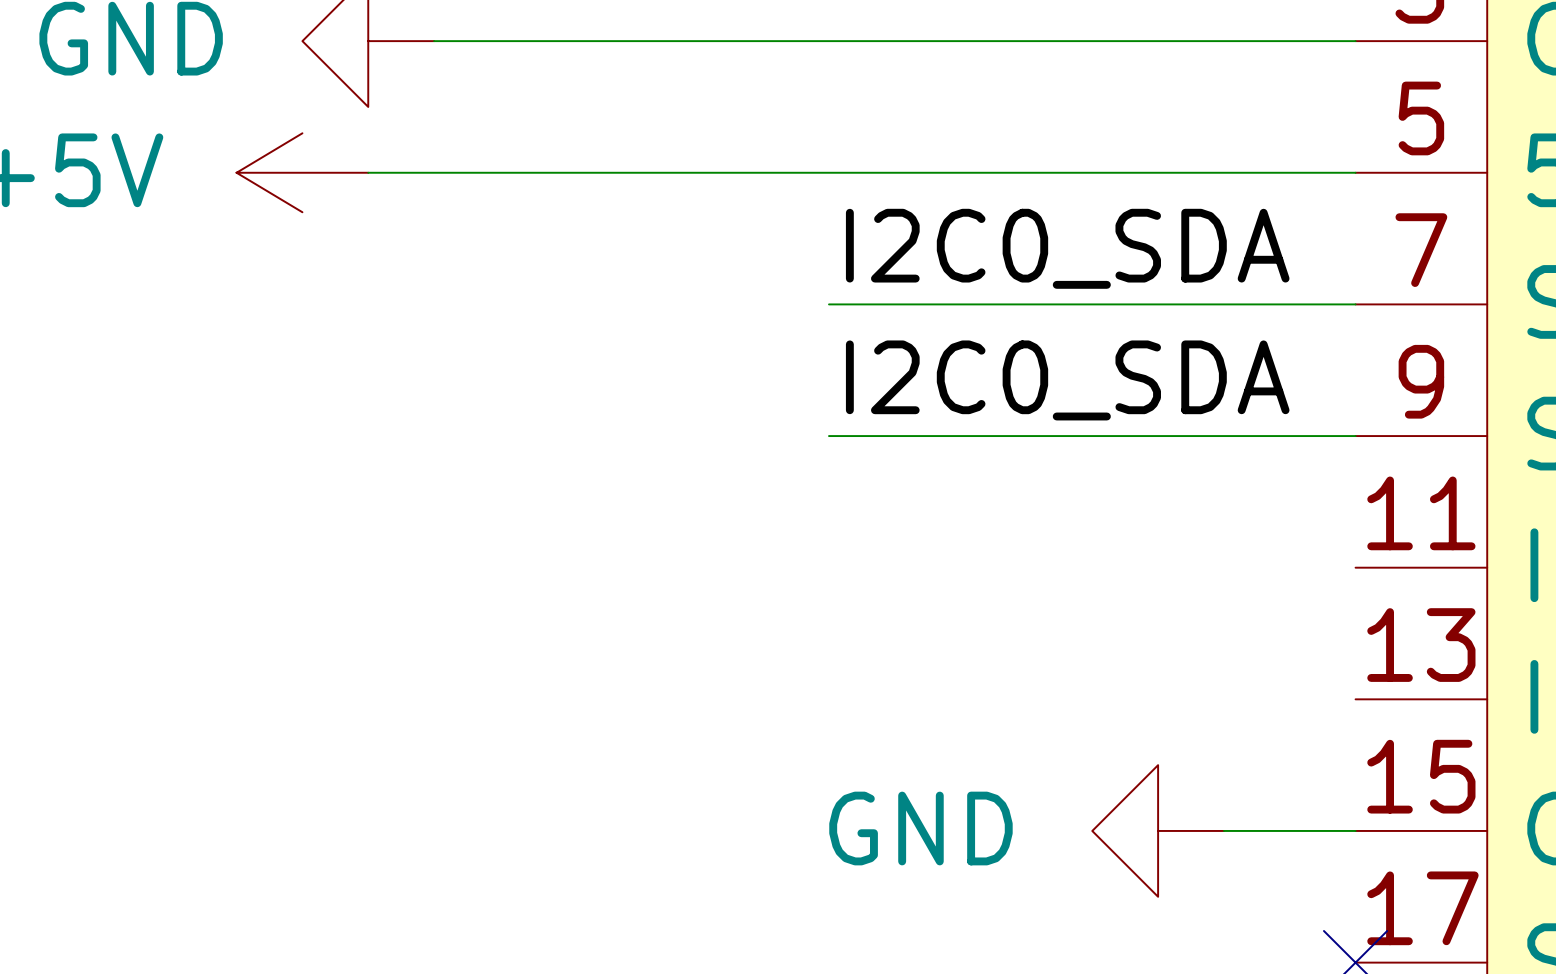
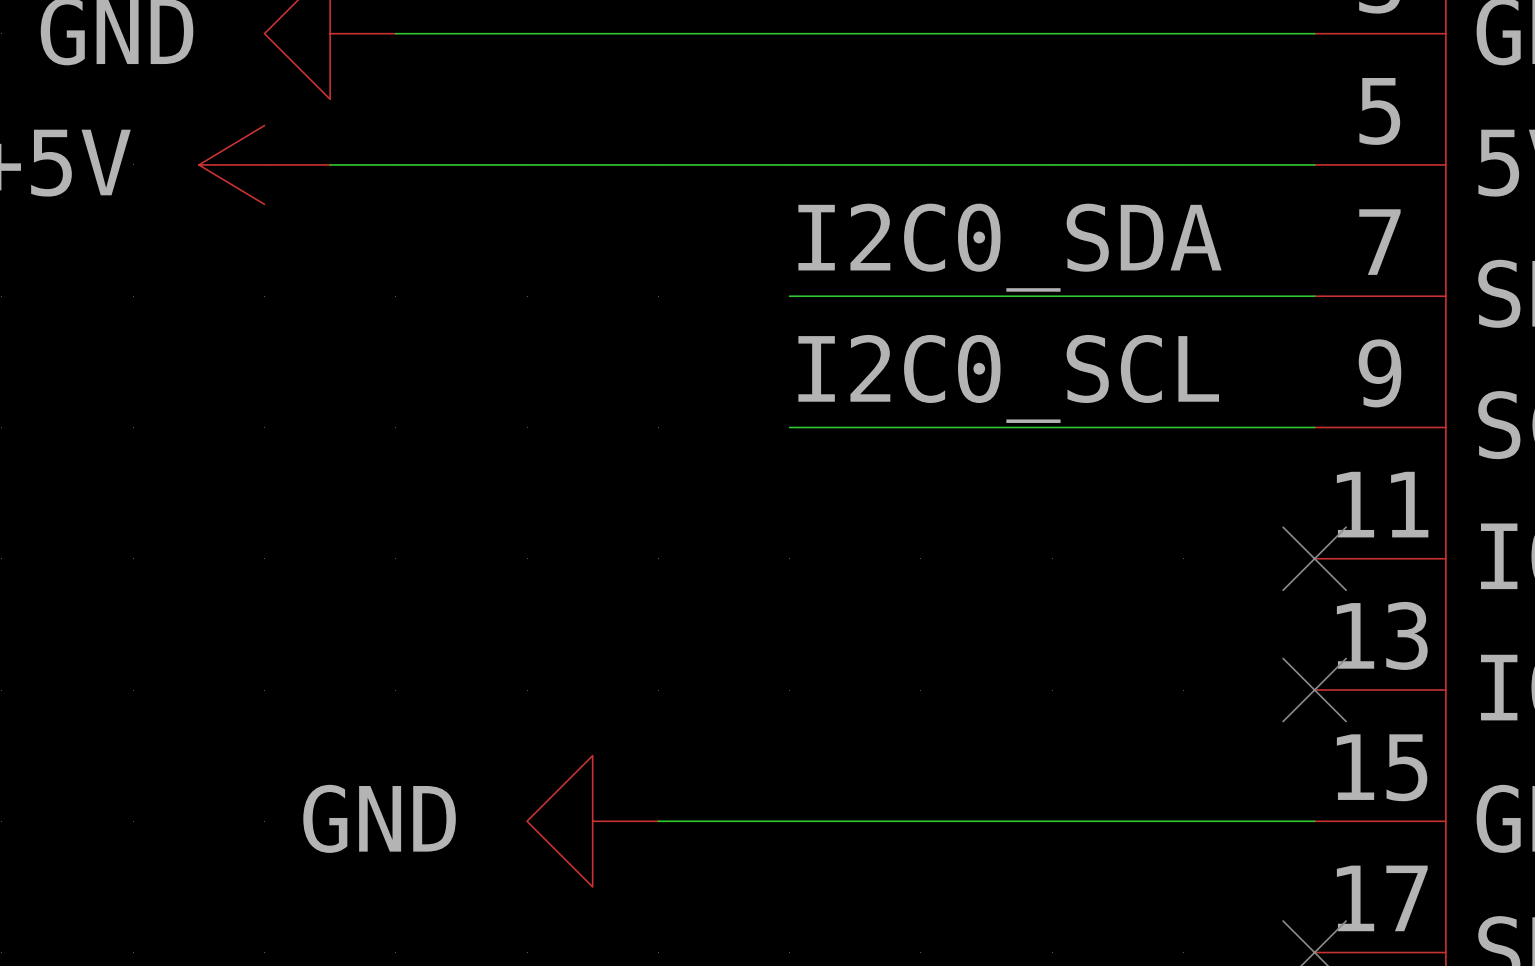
label: I2C0_SDA (1067, 380) -> I2C0_SCL (1008, 378)
no-connect mark: none -> (1314, 558)
no-connect mark: none -> (1314, 690)
wire: none -> (658, 821) (1183, 821)
power symbol position: GND (1158, 830) -> GND (592, 821)

